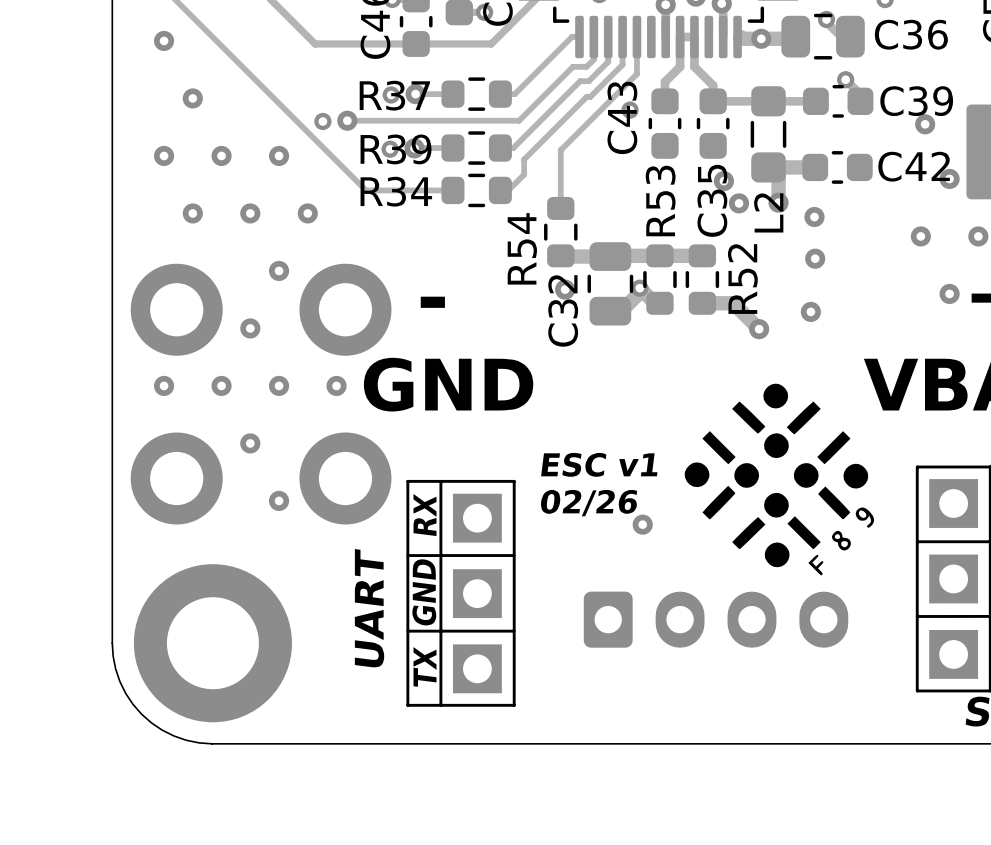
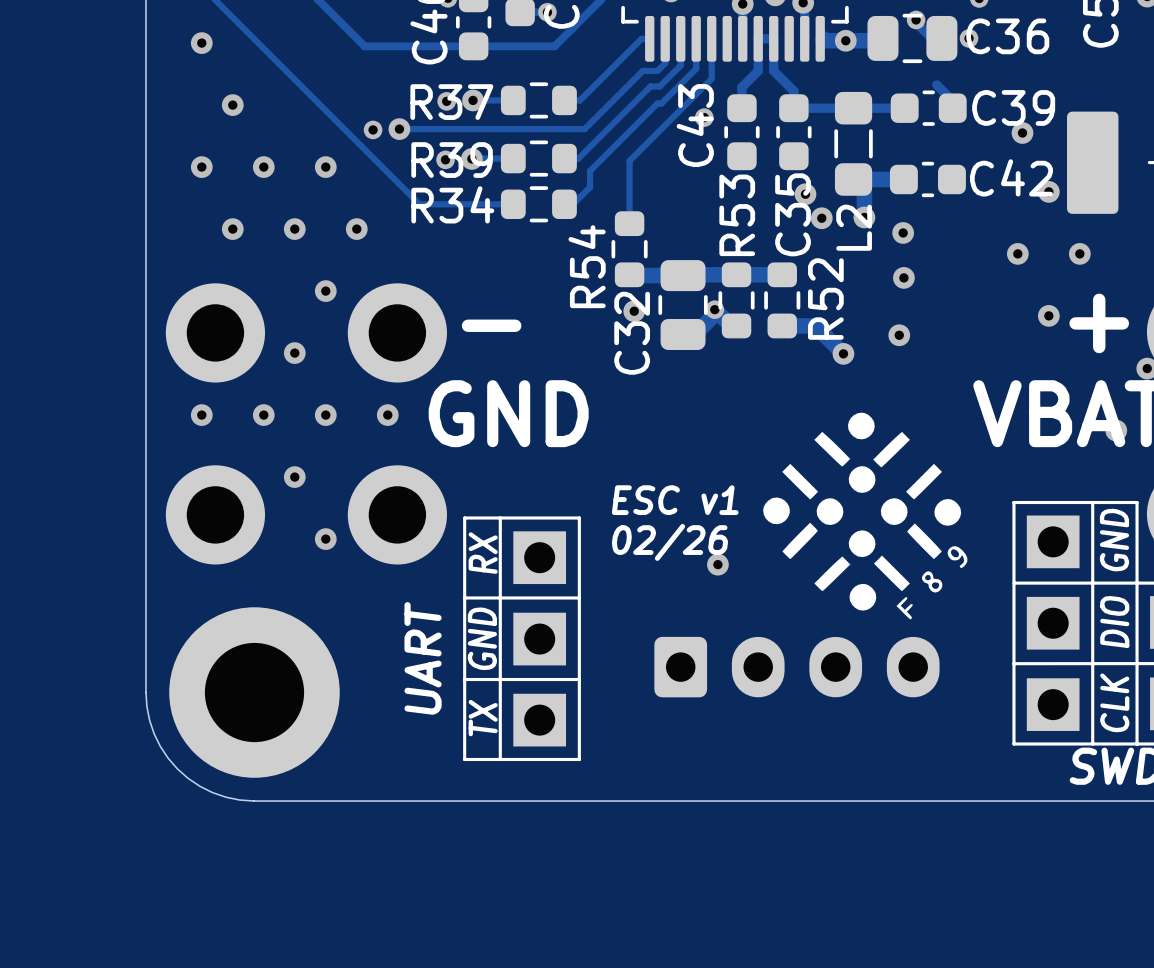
via: none -> (969, 38)
via: (845, 79) -> none

